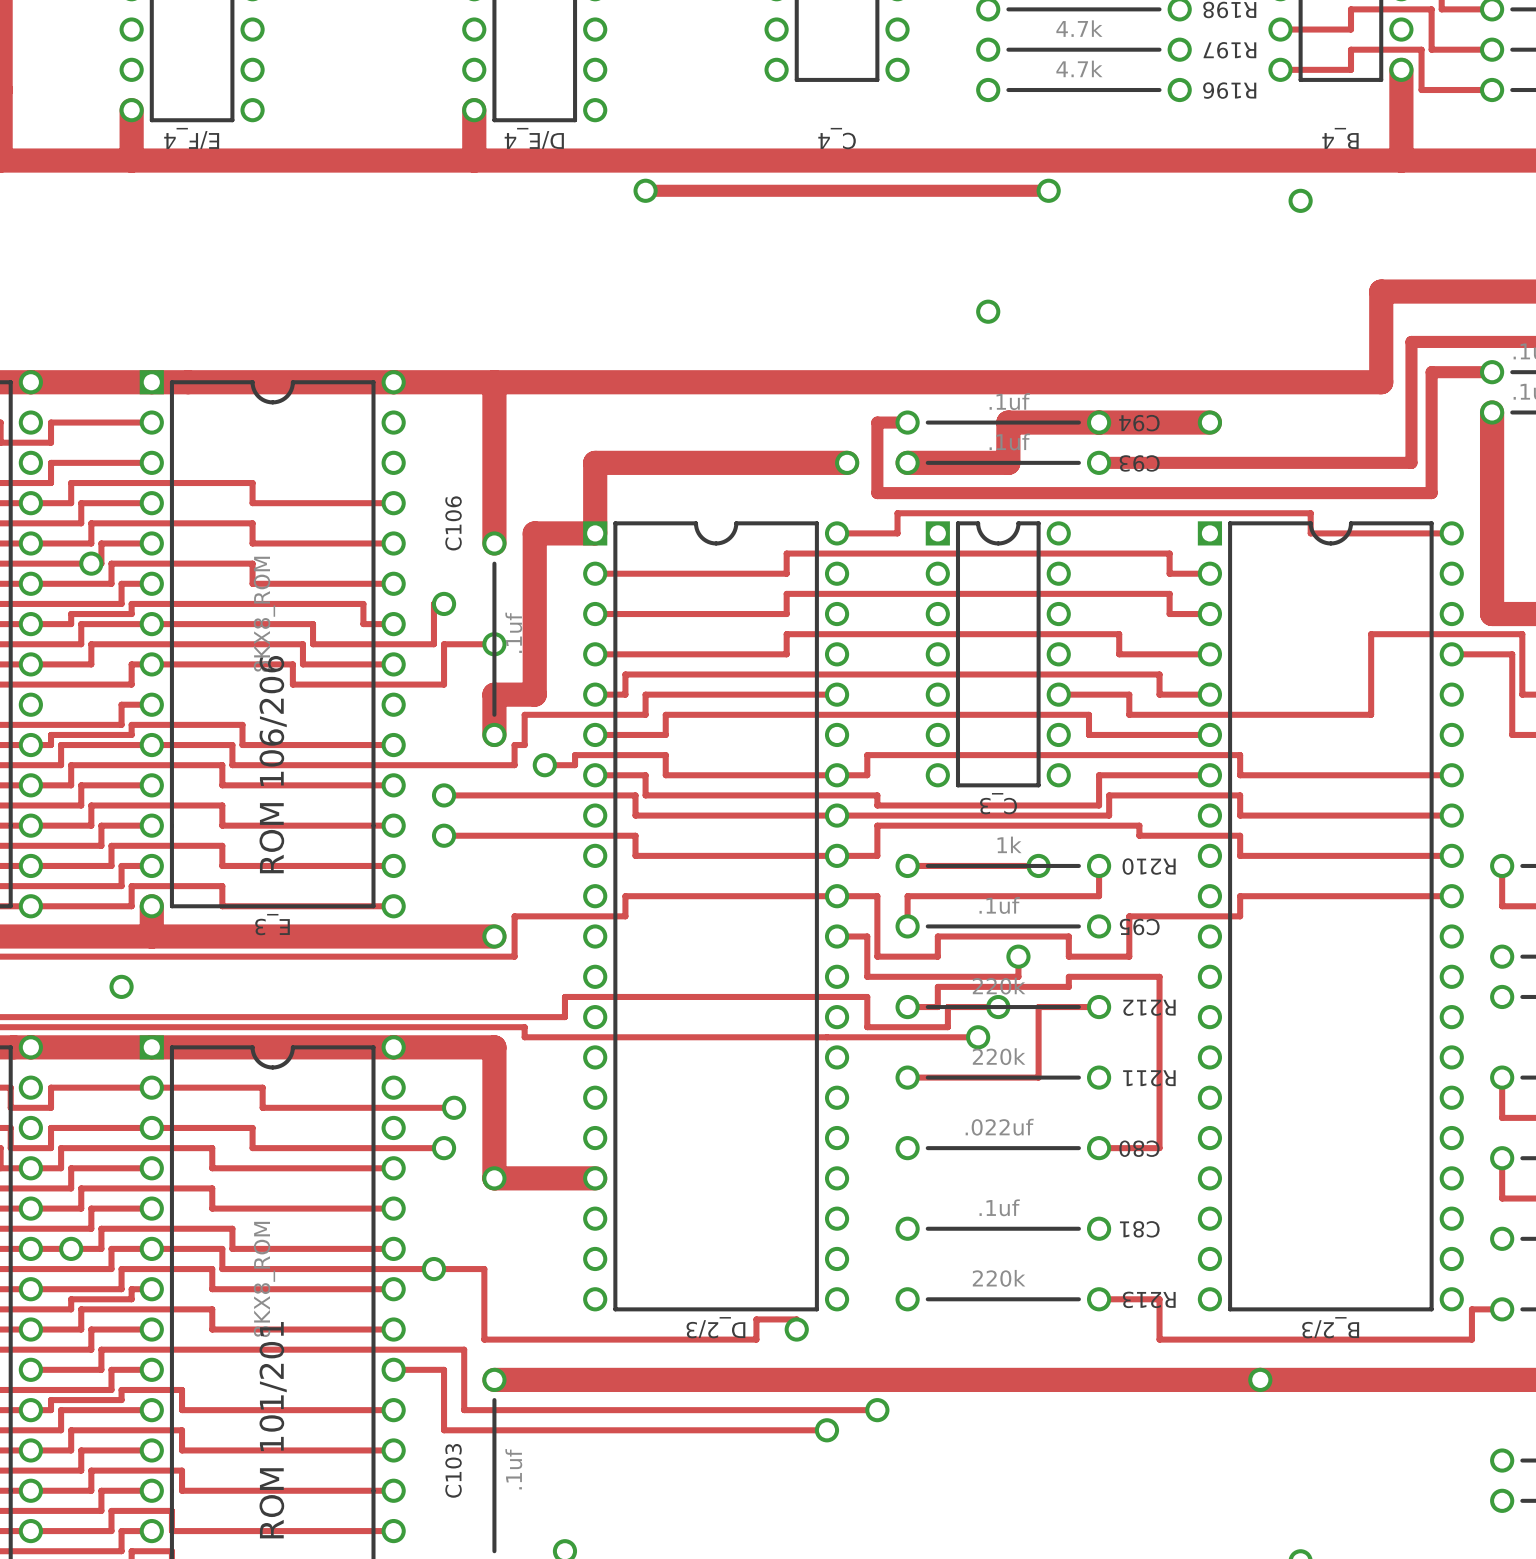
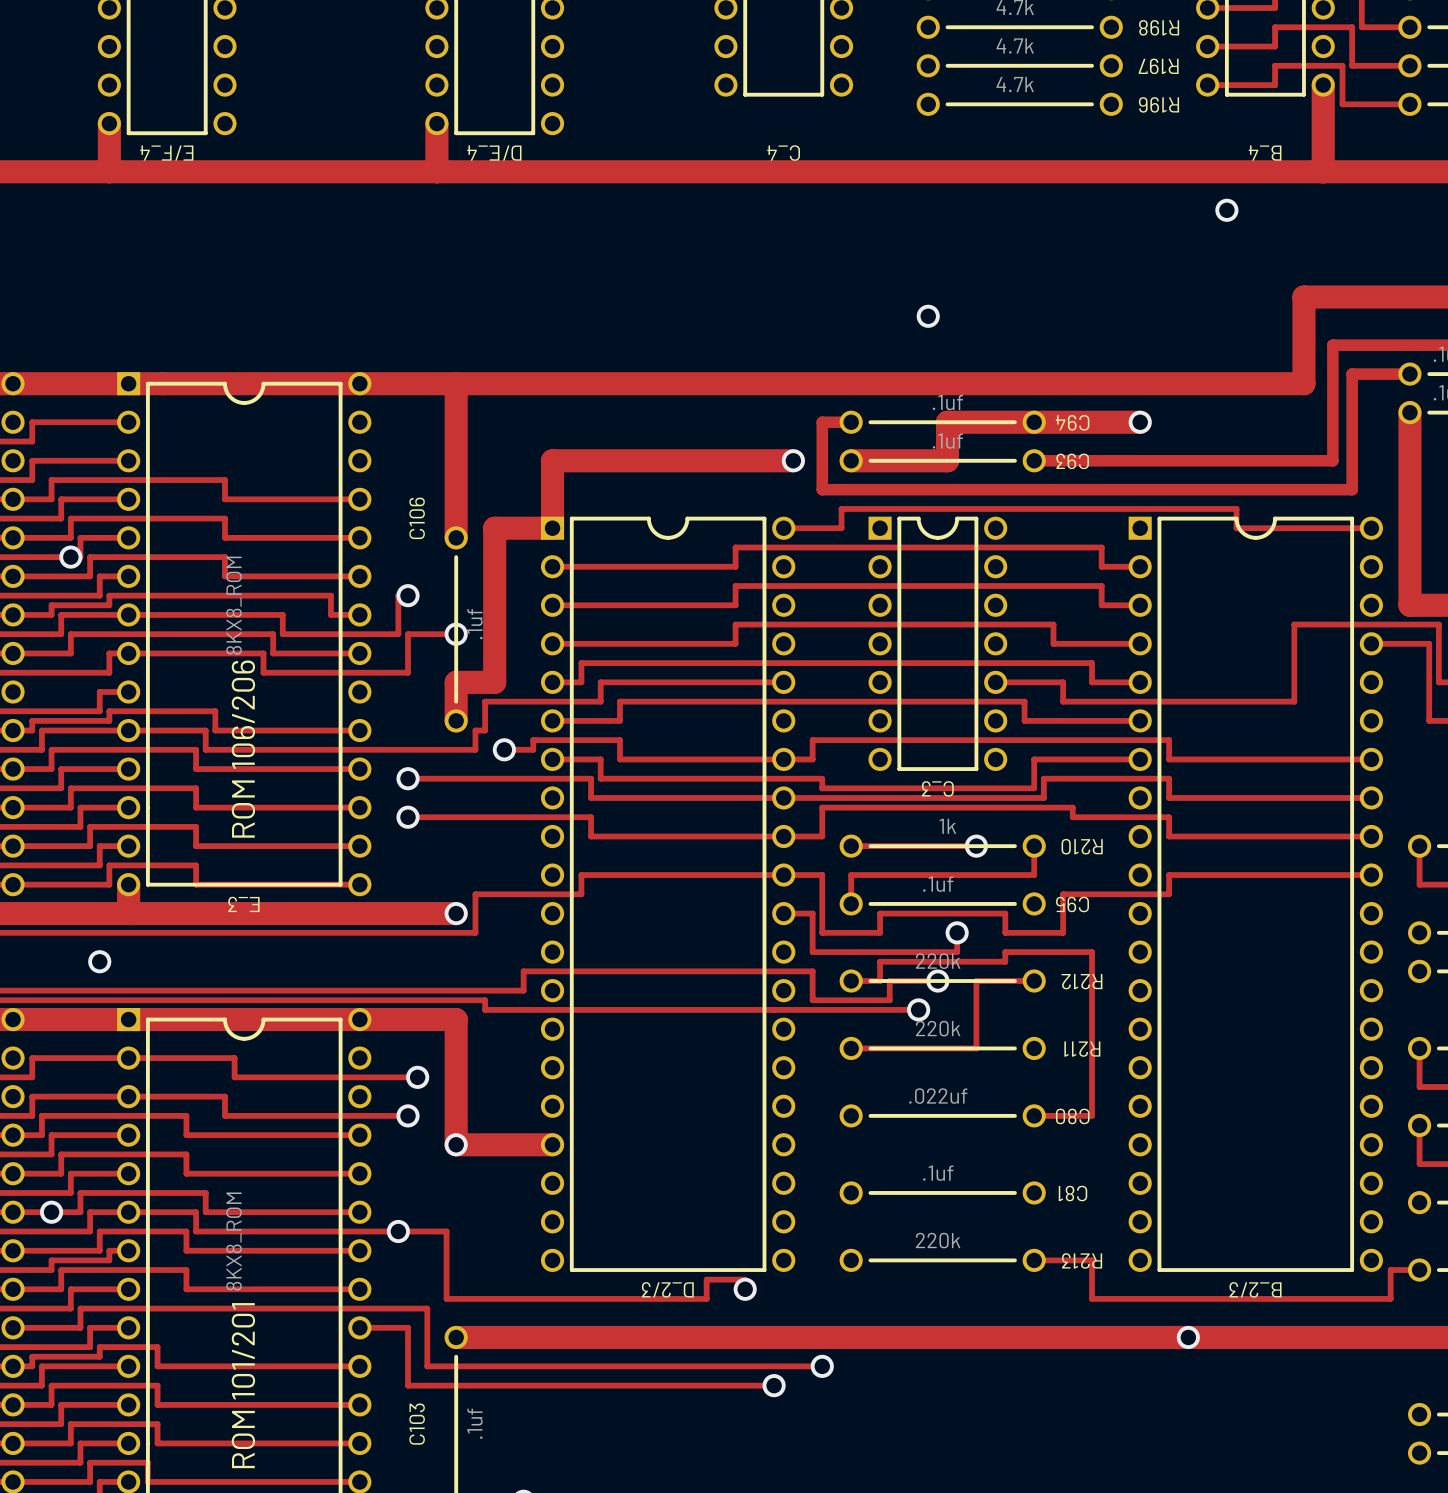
track: (645, 190) (1048, 190) -> none
via: (645, 190) -> none
via: (1048, 190) -> none

